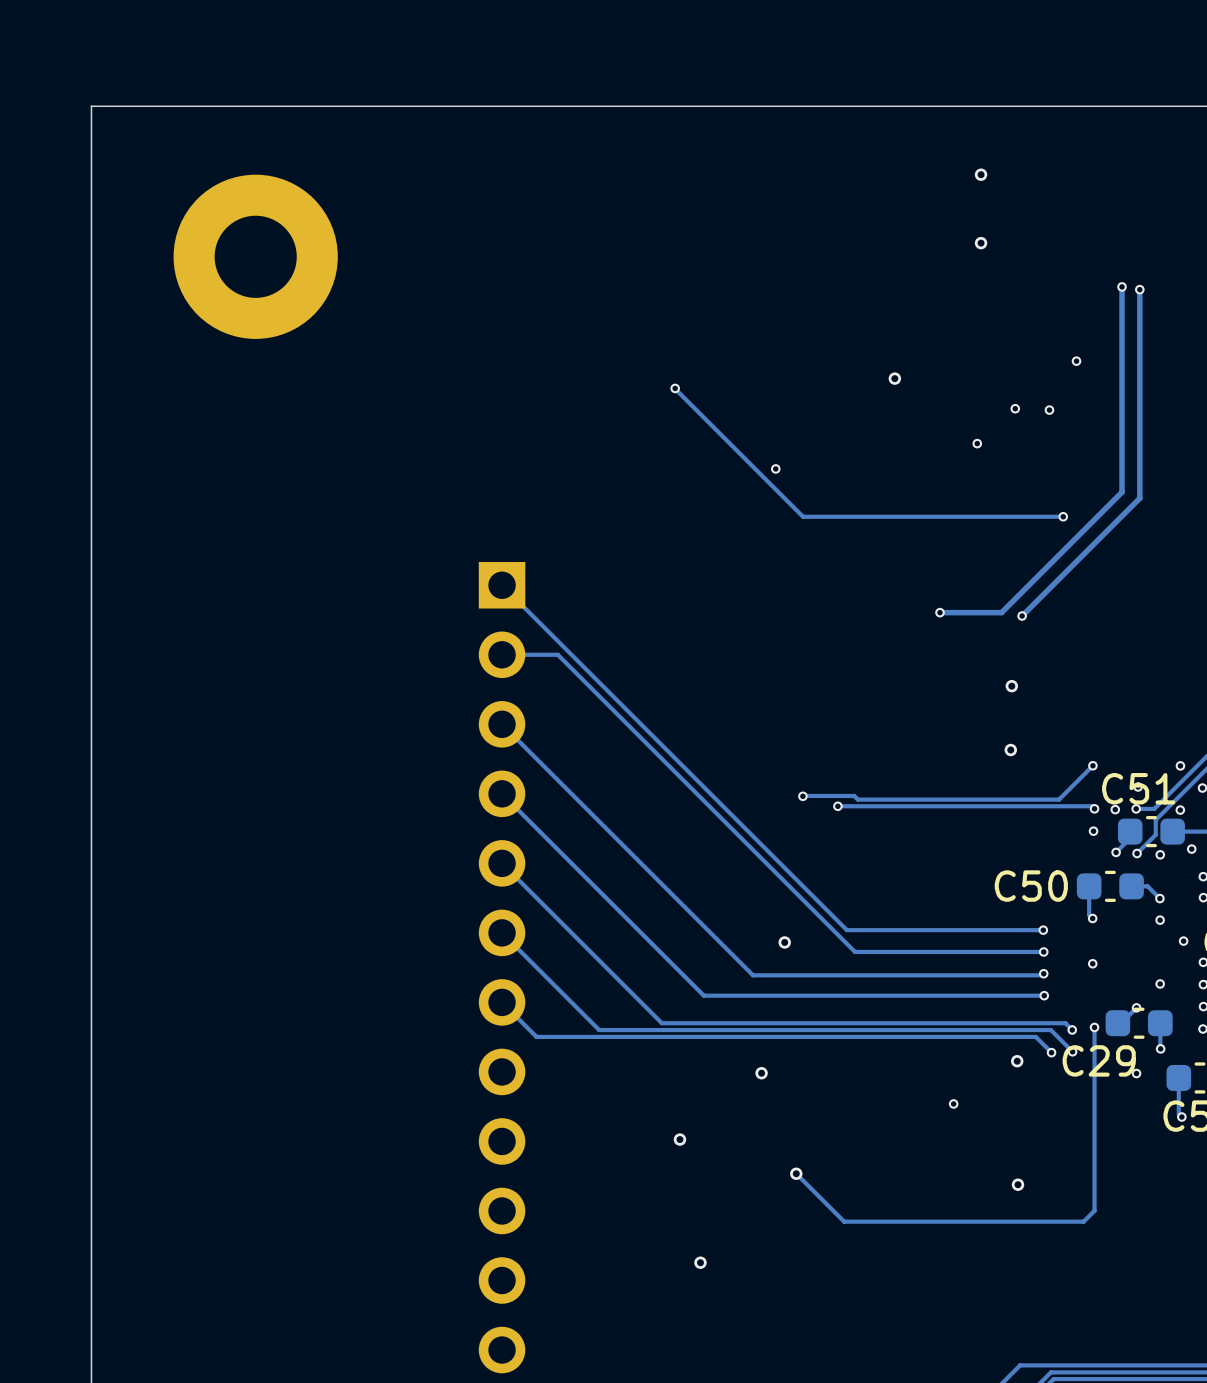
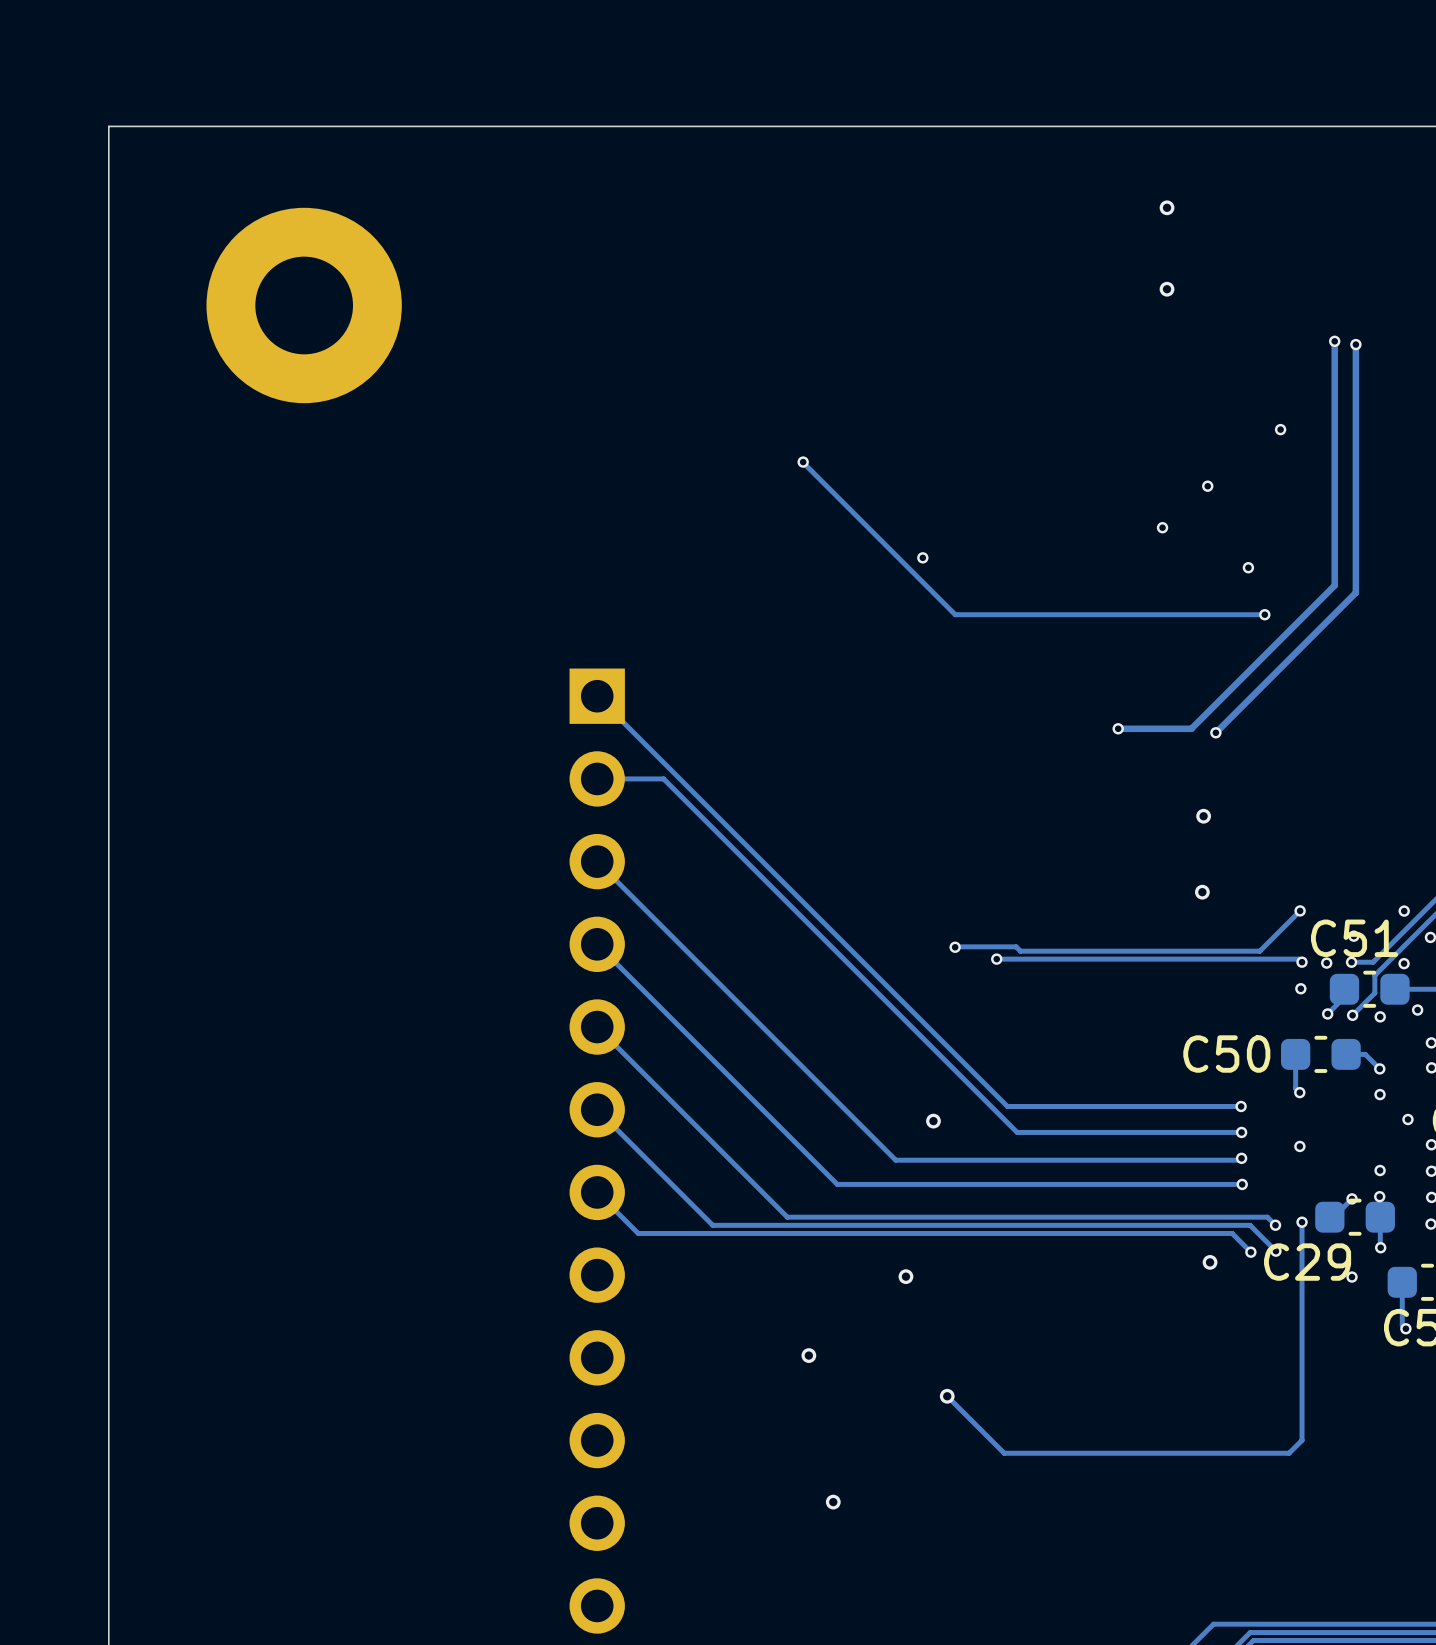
via: (894, 378) -> none
via position: (1049, 410) -> (1248, 567)
via: none -> (1379, 1196)
via: (953, 1103) -> none
via: (1018, 1184) -> none

